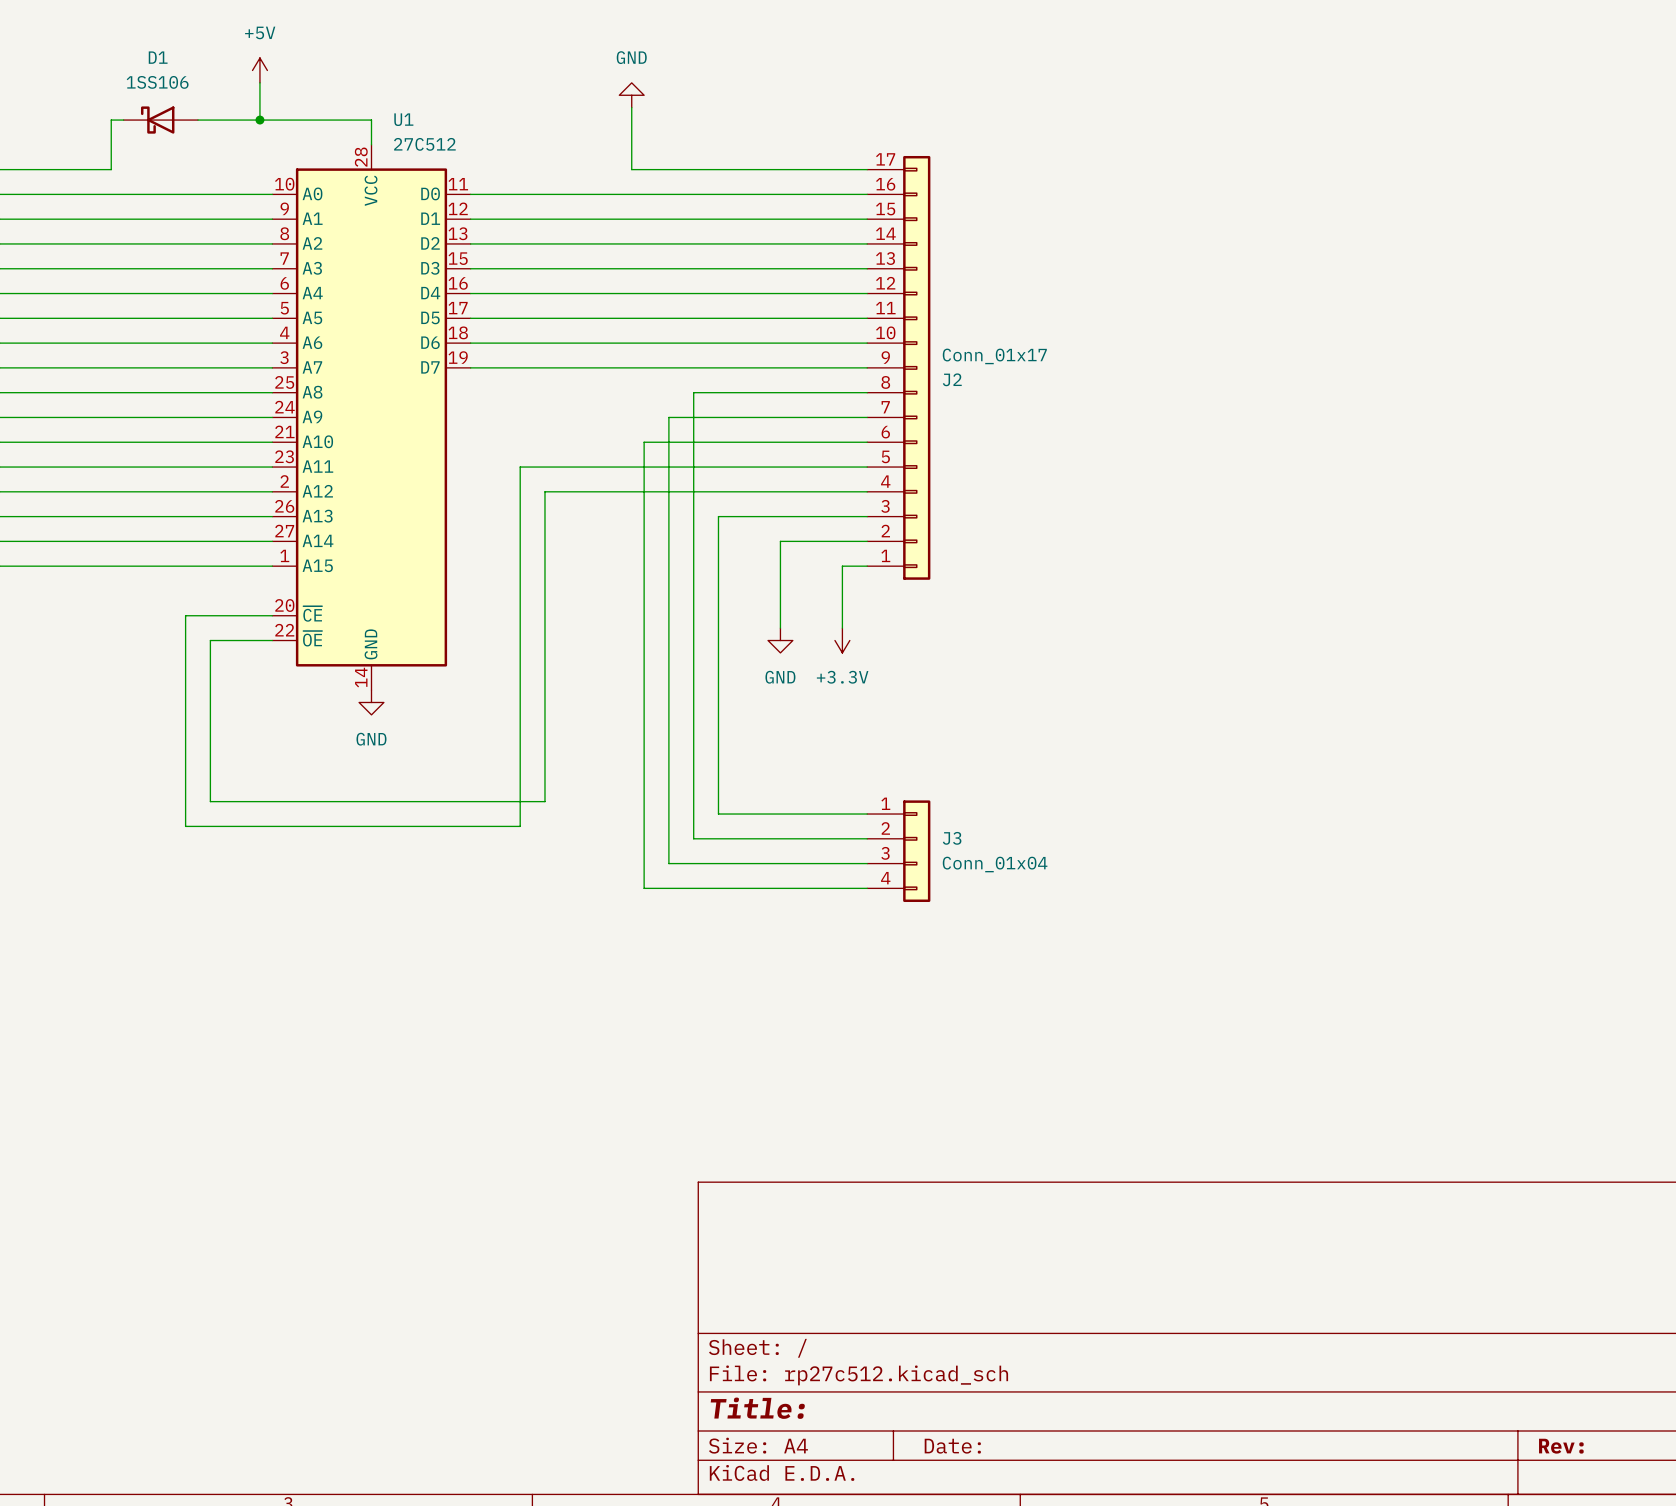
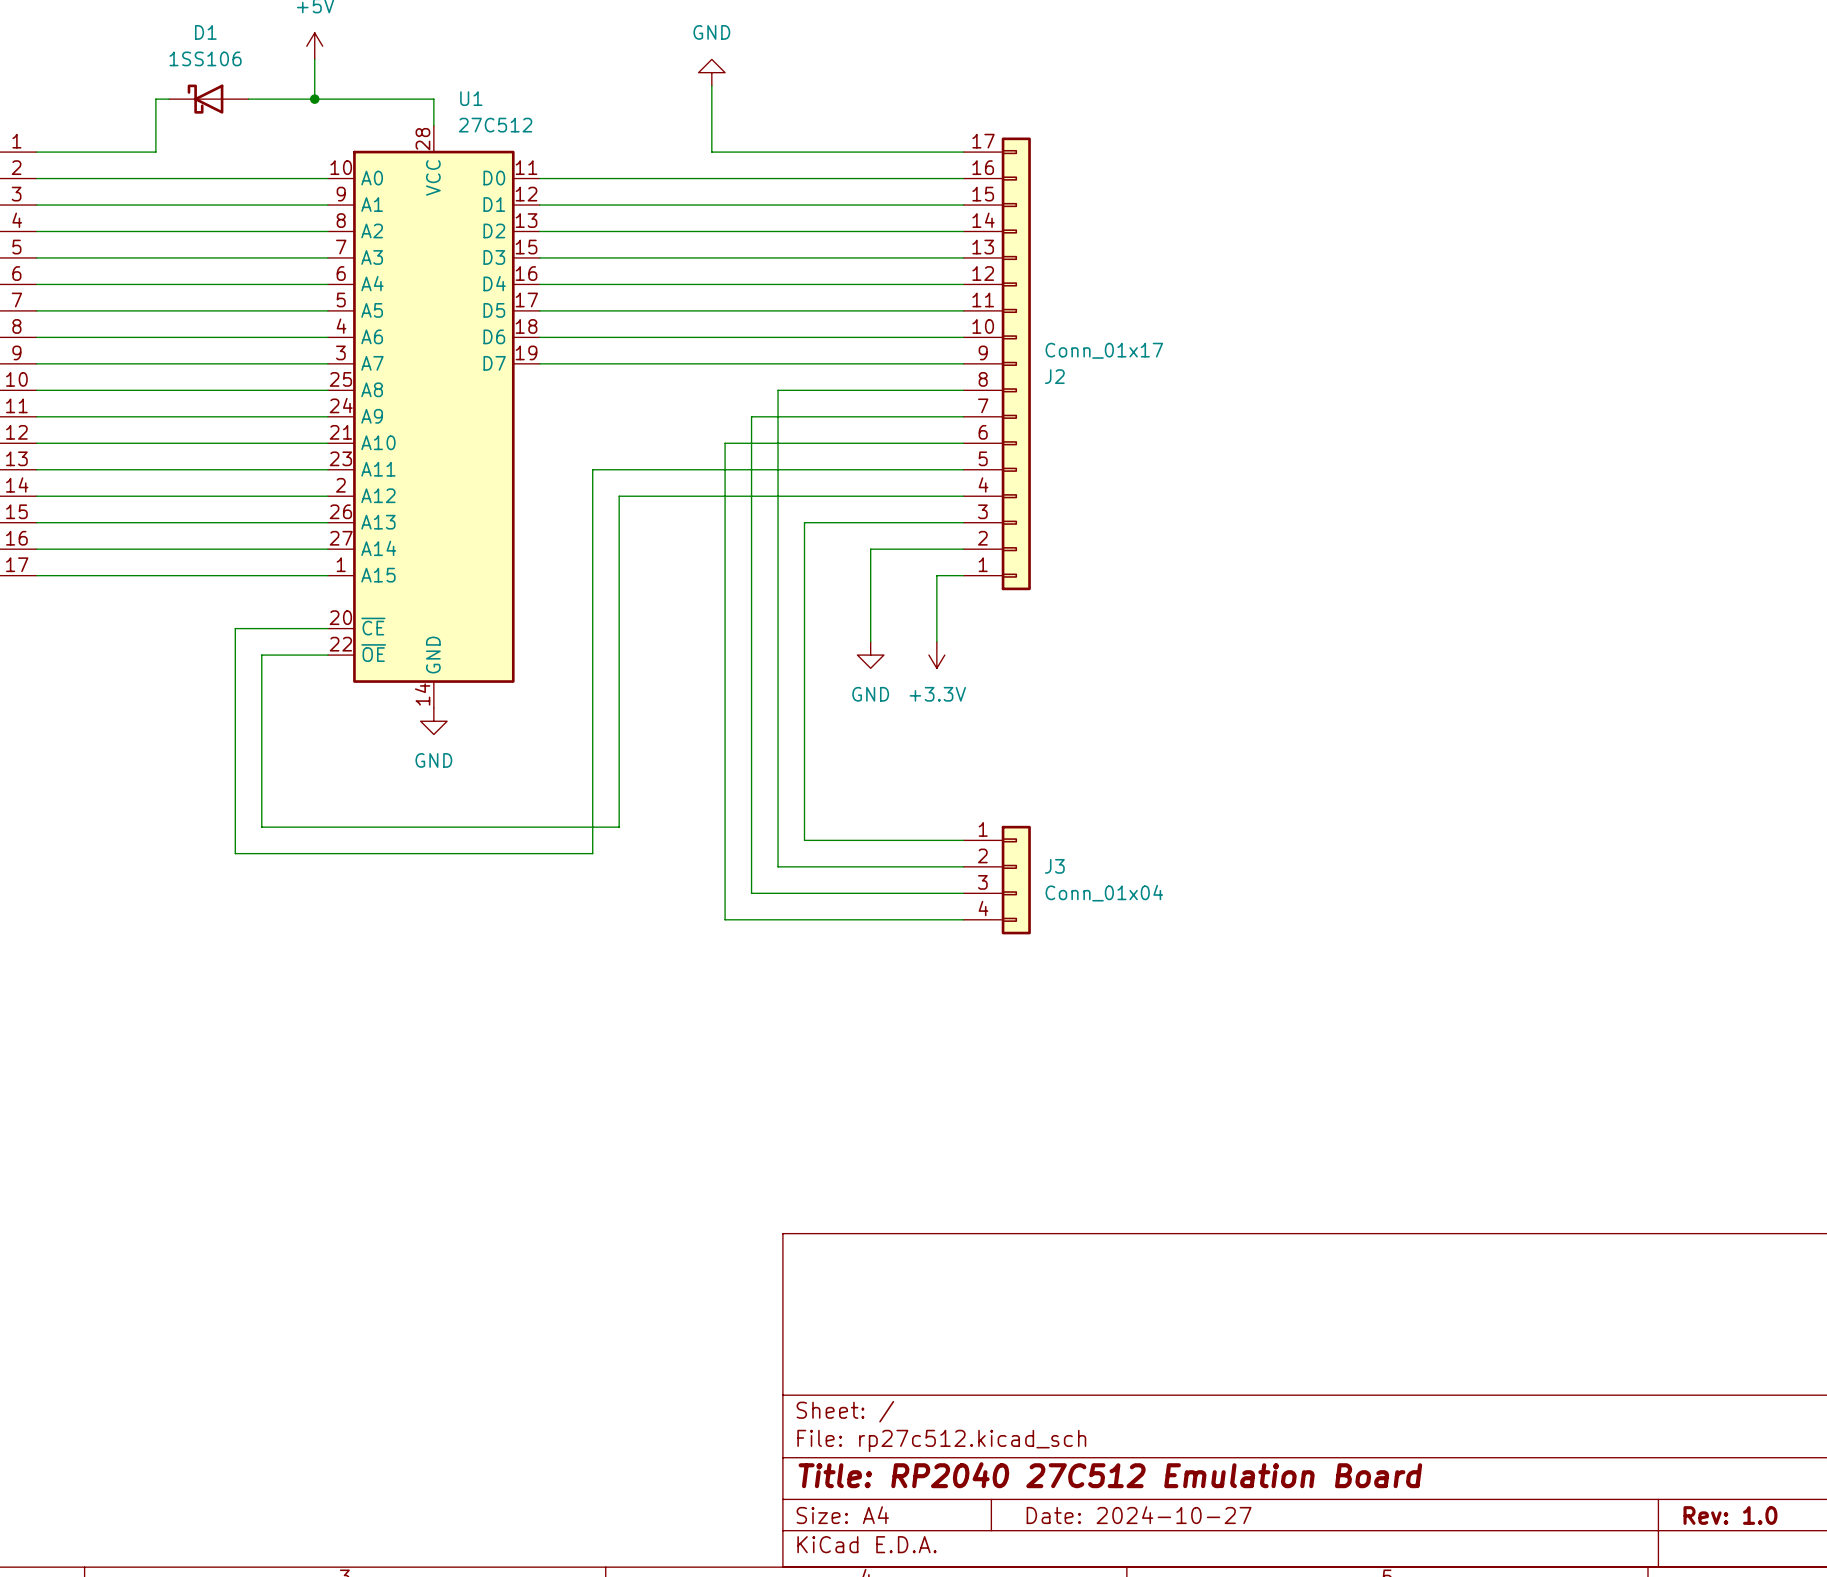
title block: Title: (757, 1408) -> Title: RP2040 27C512 Emulation Board (1110, 1475)
title block: Date: (952, 1446) -> Date: 2024-10-27 (1139, 1515)
title block: Rev: (1561, 1446) -> Rev: 1.0 (1730, 1515)

